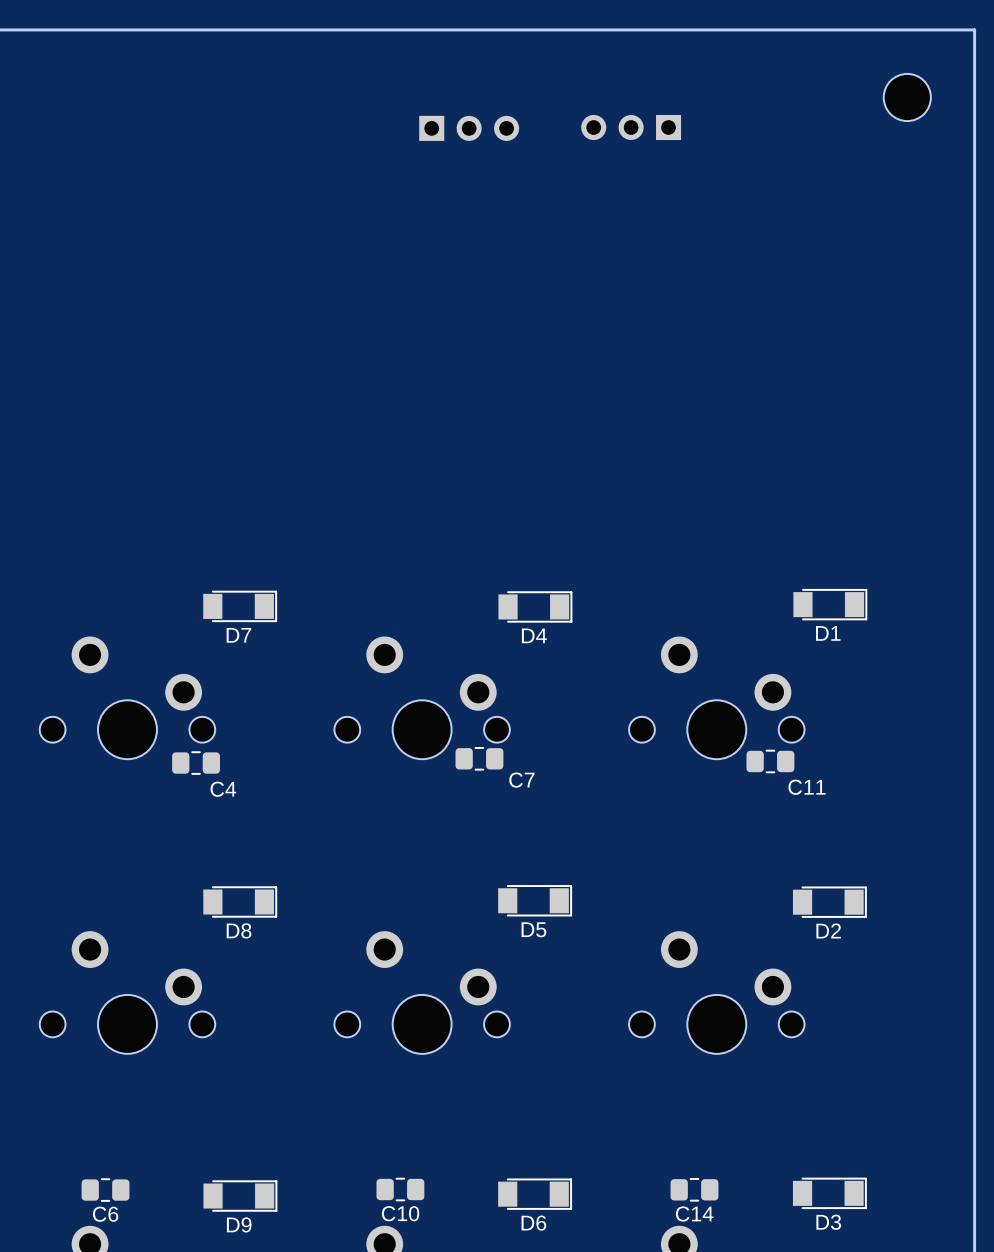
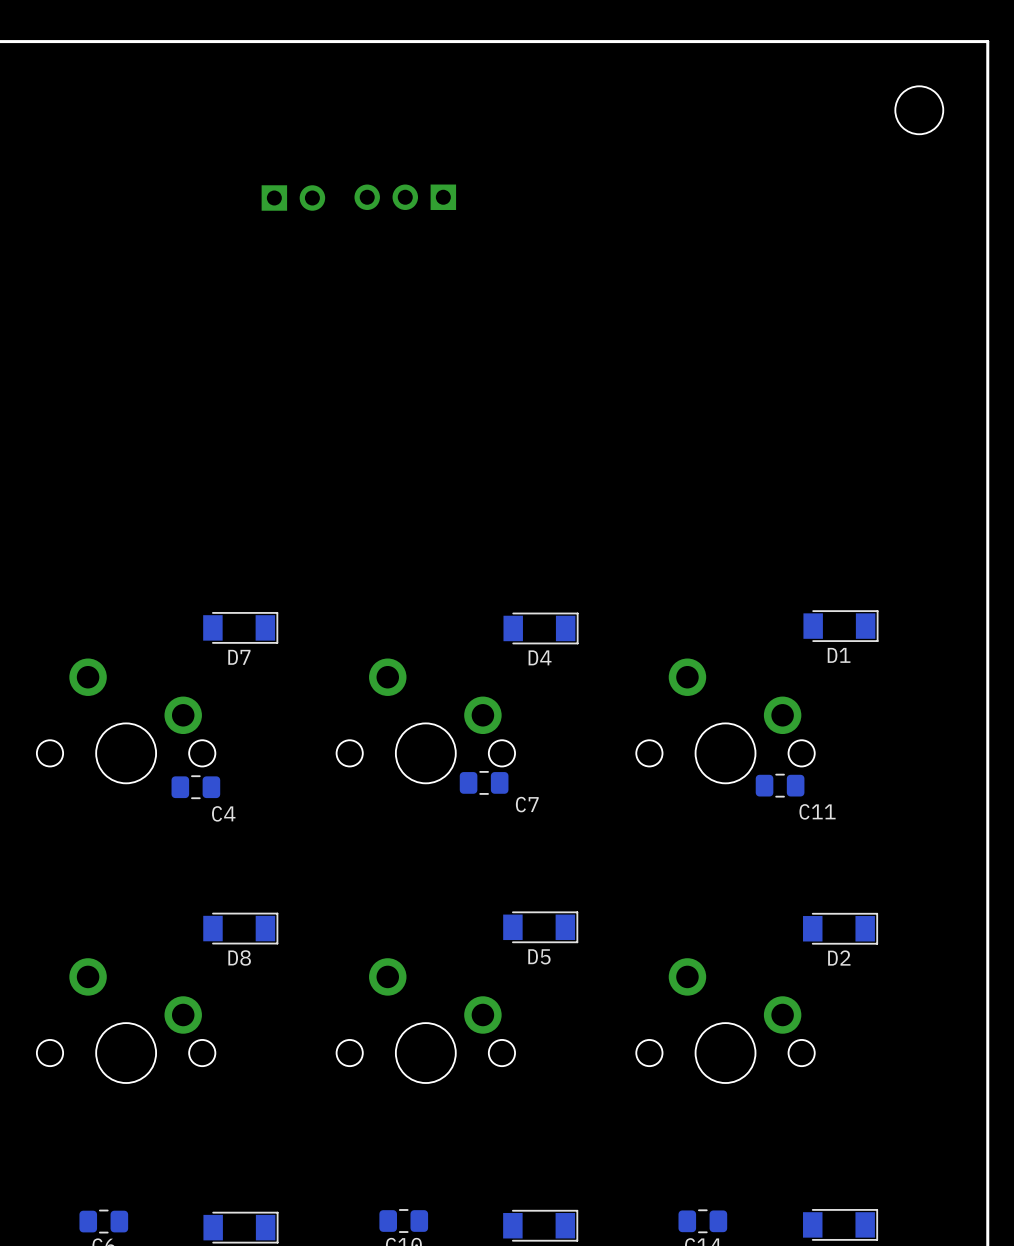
part: (631, 127) -> none
part rotation: 0° (469, 128) -> 180° (405, 197)
part position: (469, 128) -> (405, 197)
part: none -> (293, 198)

